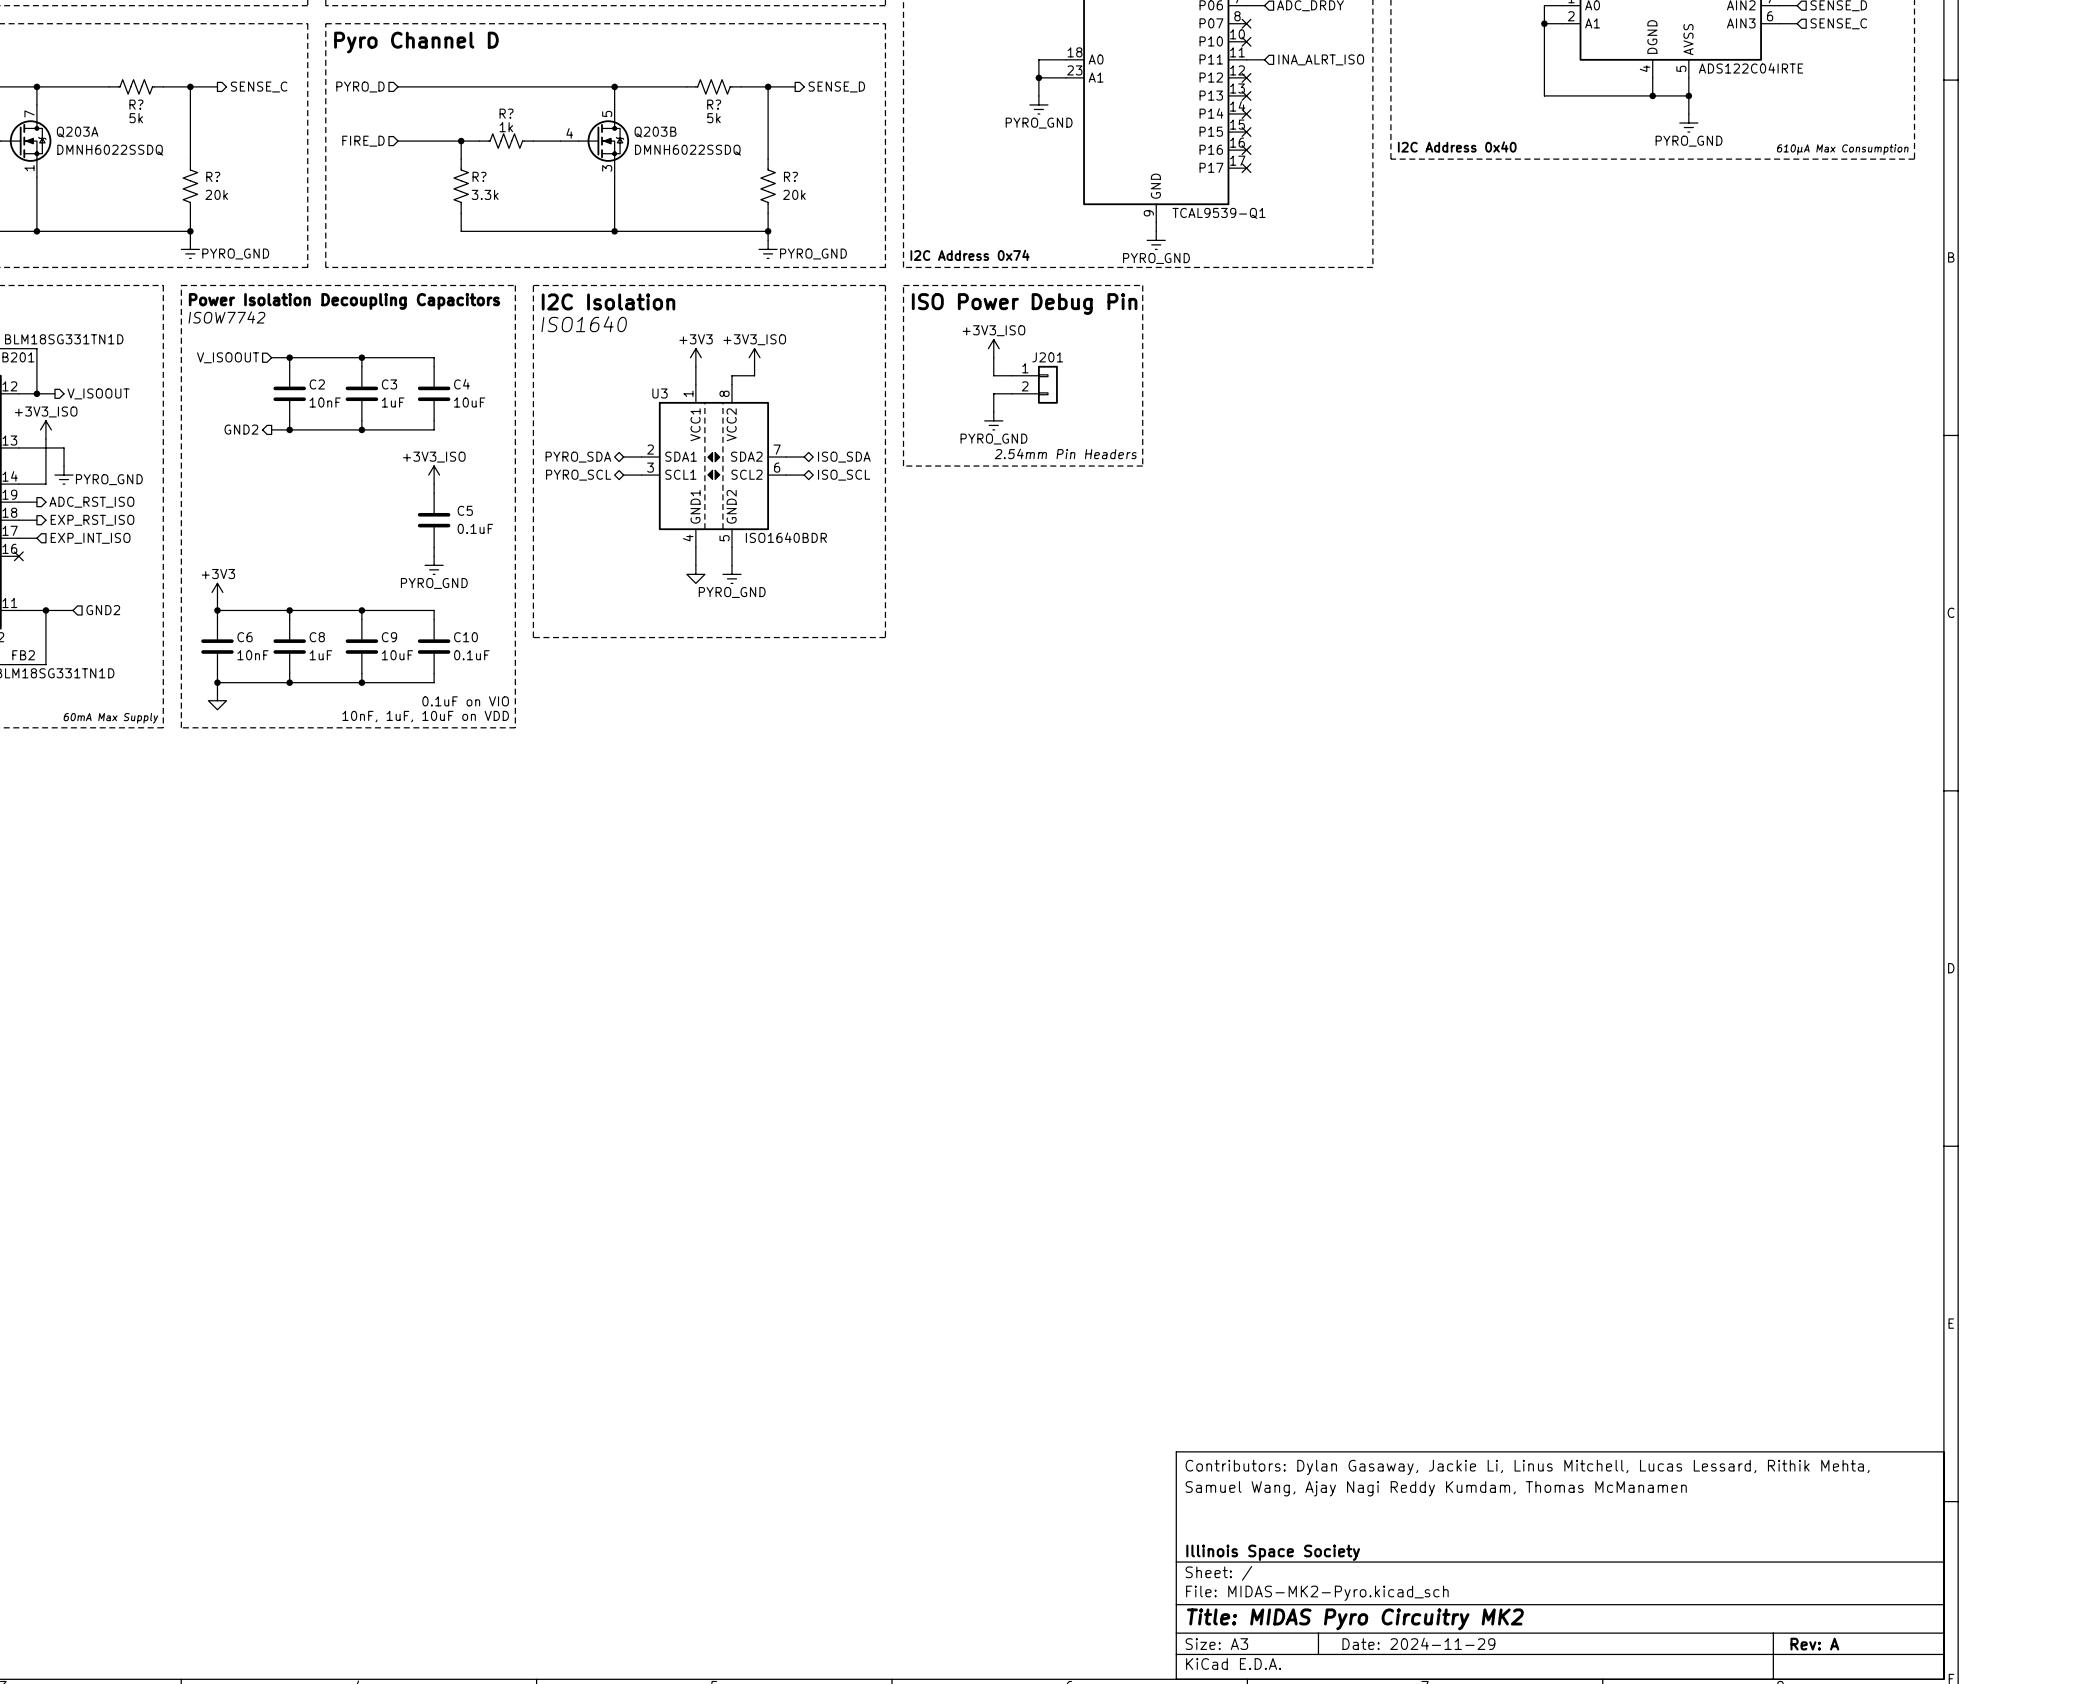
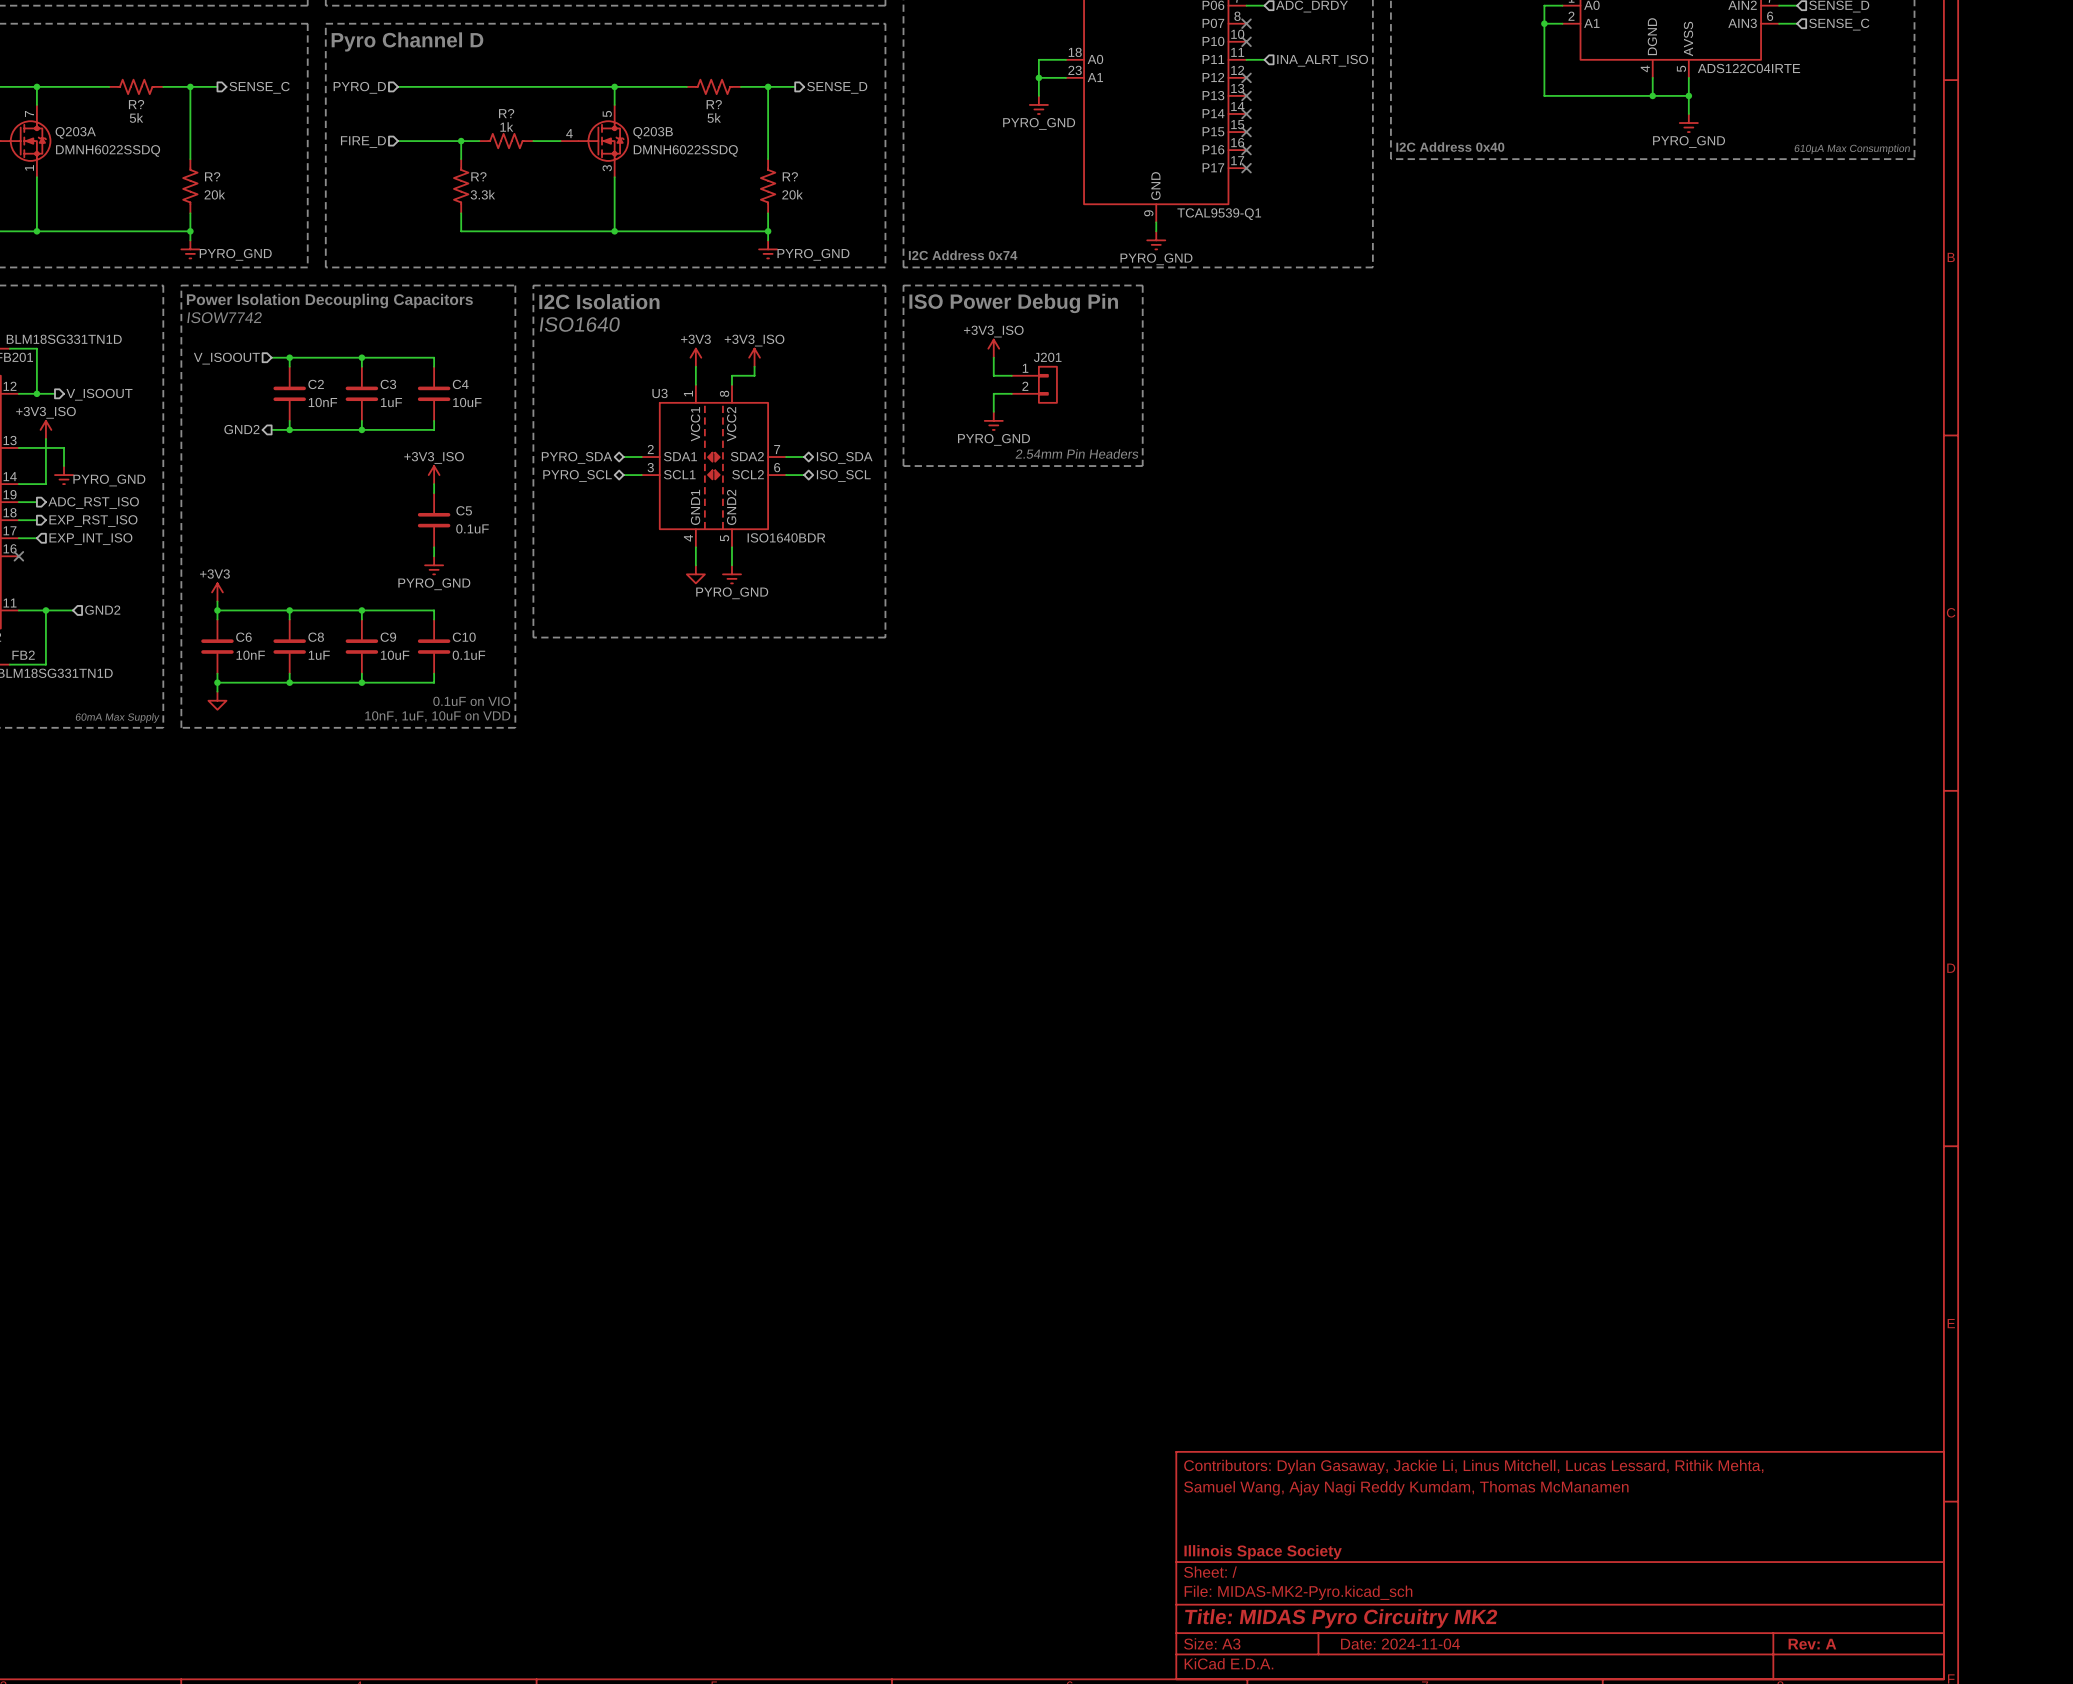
title block: Date: 2024-11-29 (1418, 1643) -> Date: 2024-11-04 (1400, 1644)

